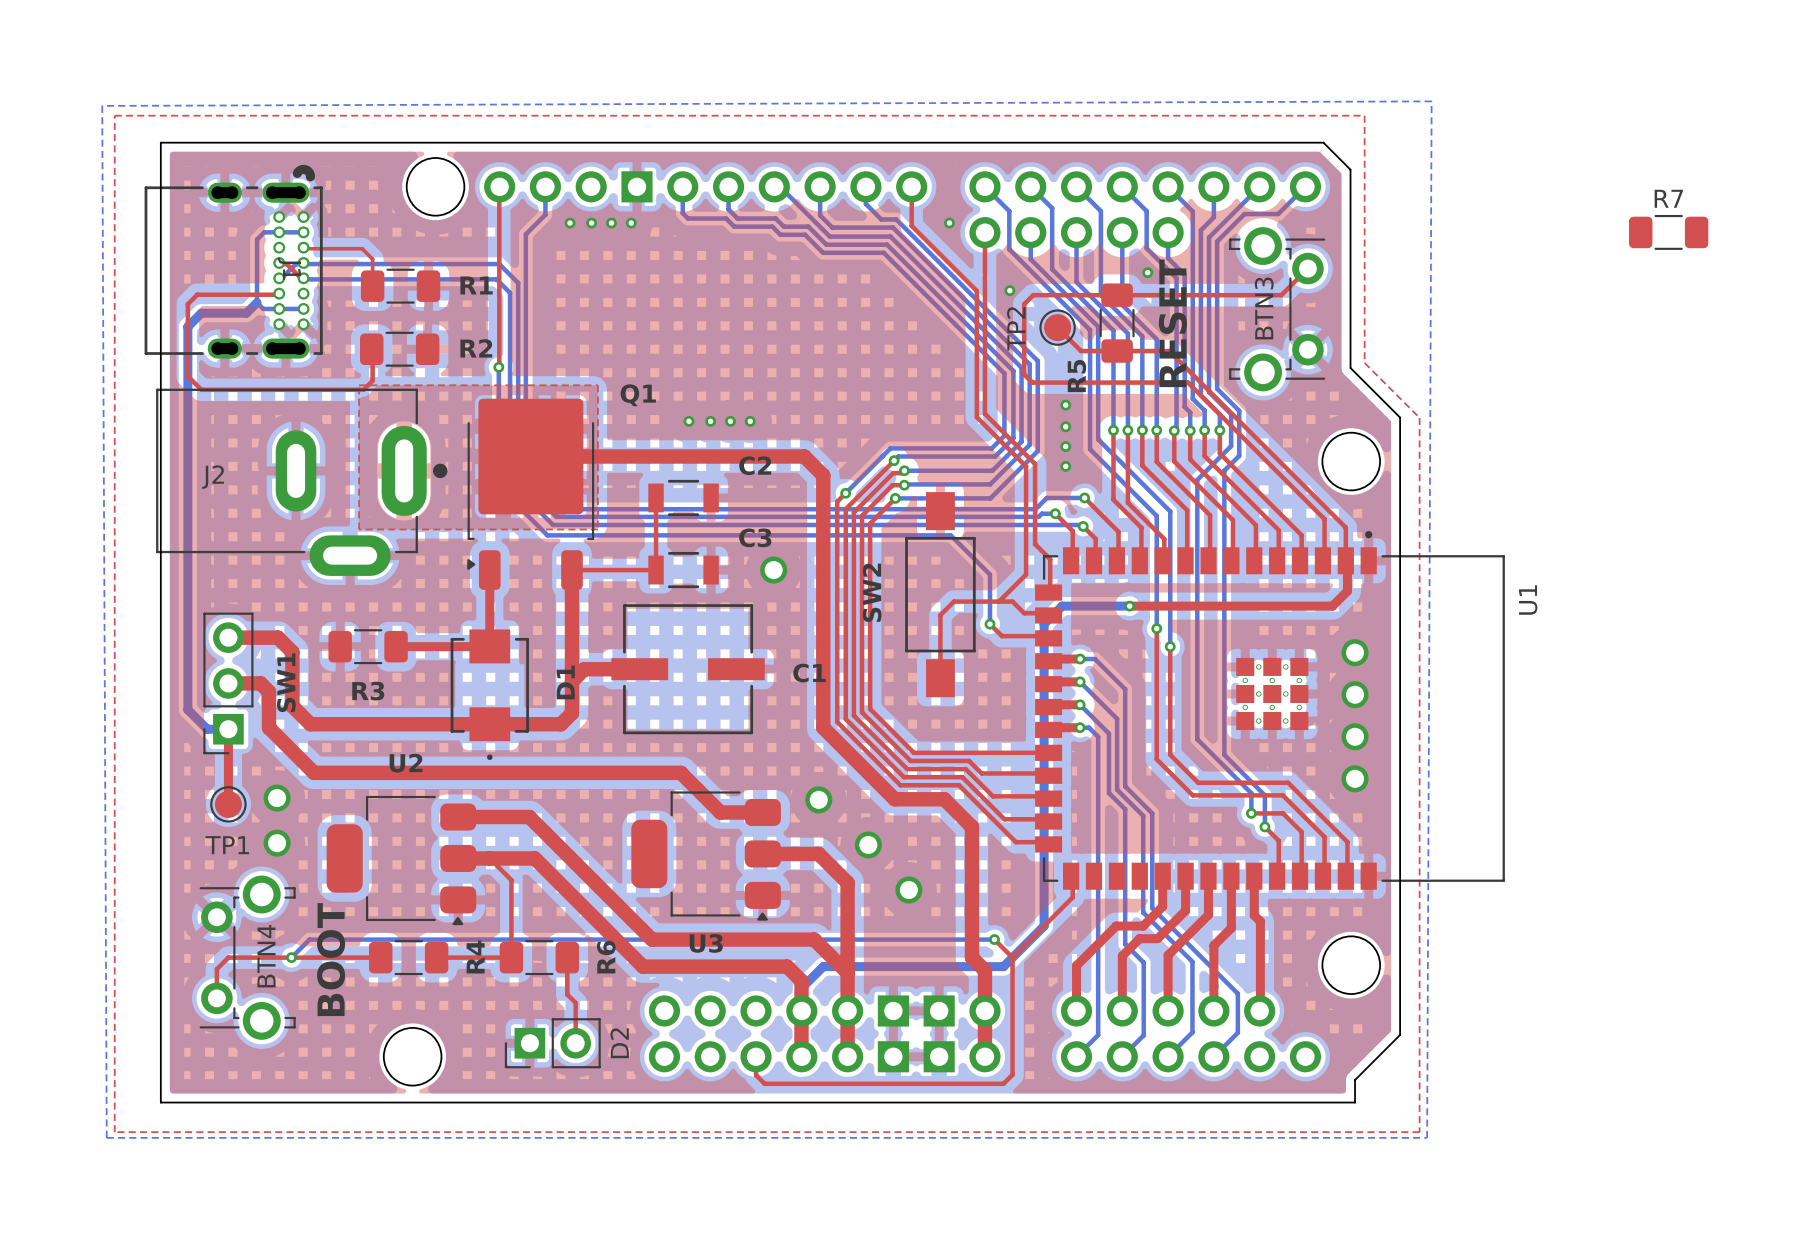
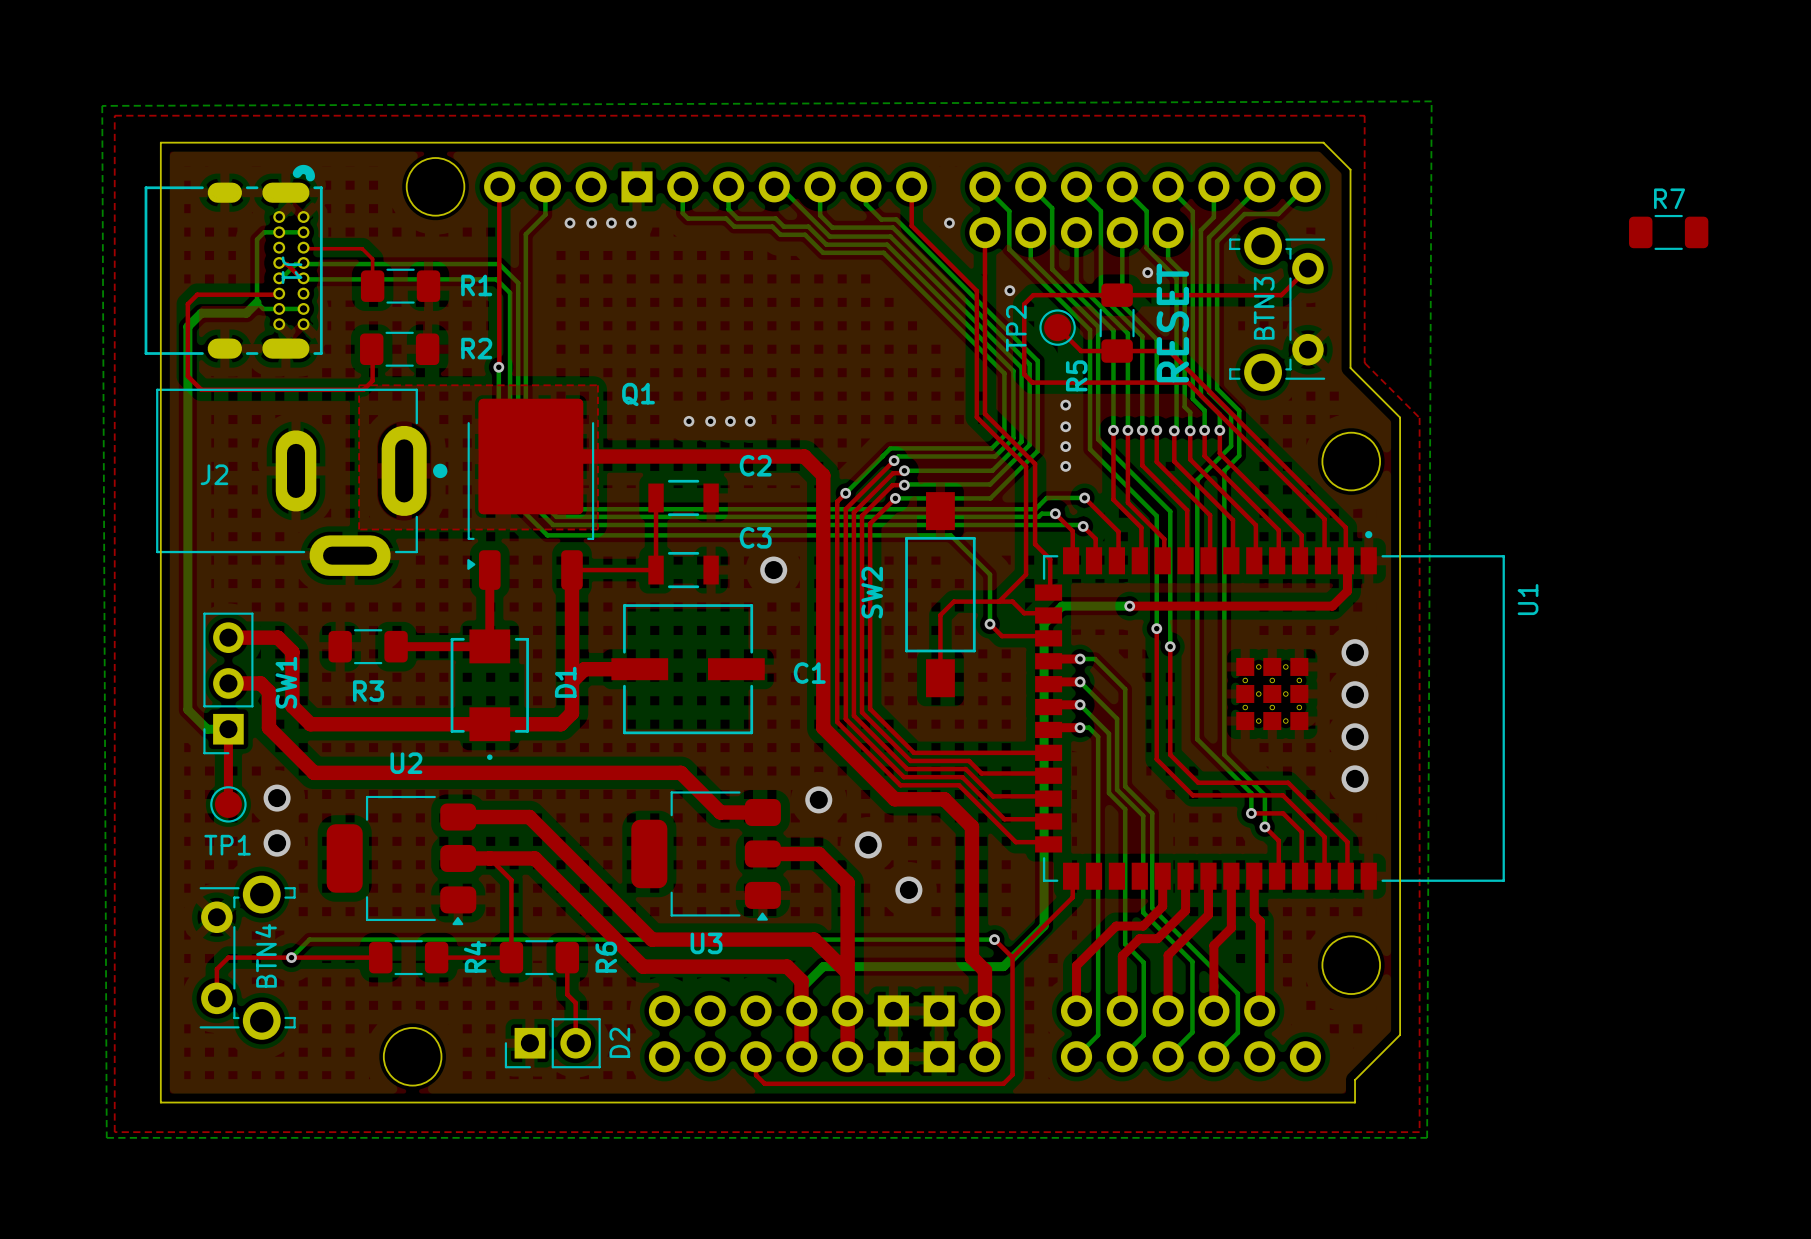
text: BOOT (331, 959) -> none

